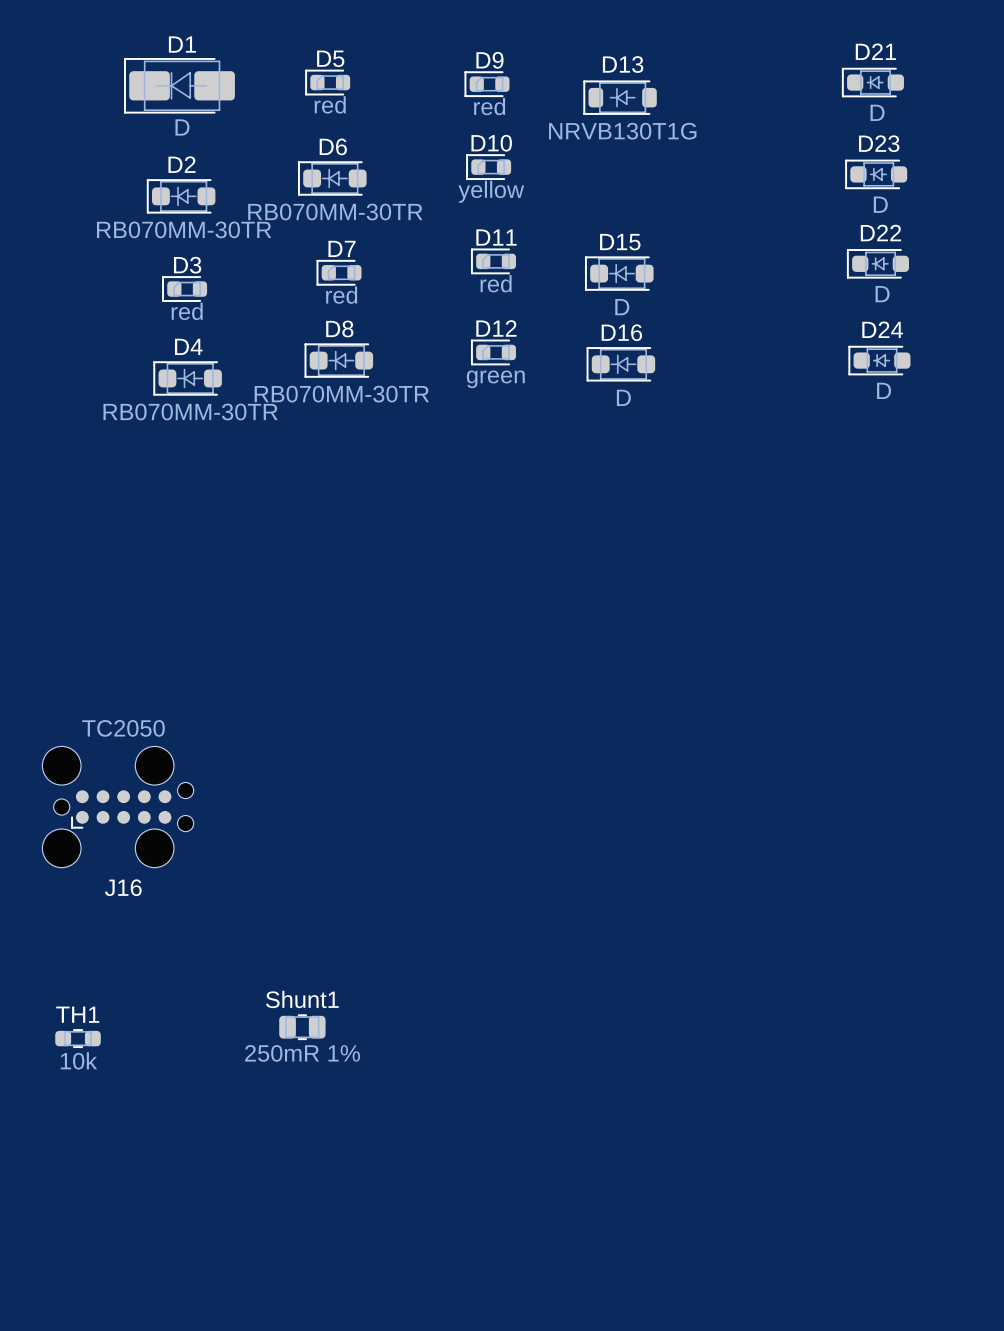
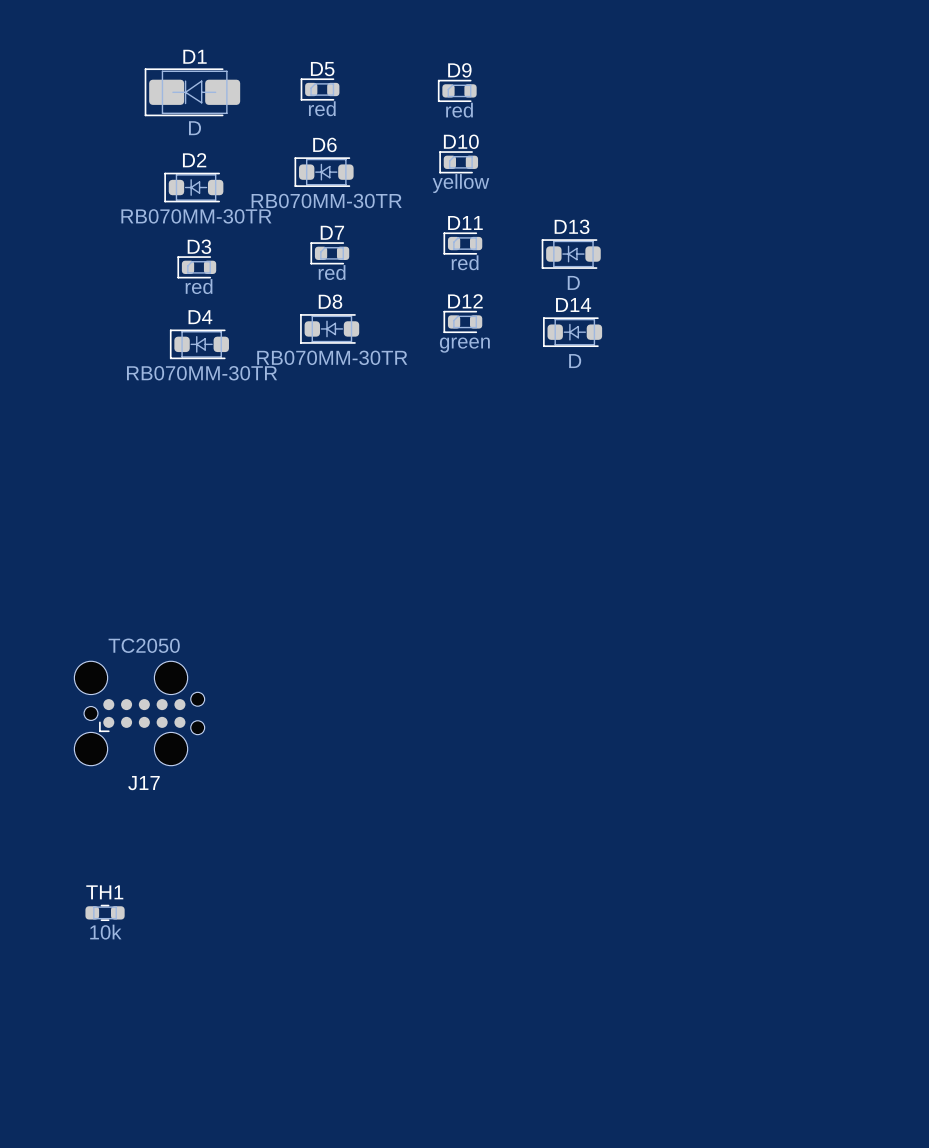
D21: D (872, 82) -> none
D13: NRVB130T1G (620, 97) -> none
D23: D (876, 174) -> none
D15 name: D15 (620, 242) -> D13 (572, 226)
D22: D (877, 263) -> none
D16 name: D16 (621, 332) -> D14 (573, 304)
D24: D (879, 360) -> none
J16 name: J16 (123, 887) -> J17 (144, 783)
Shunt1: 250mR 1% (302, 1027) -> none

